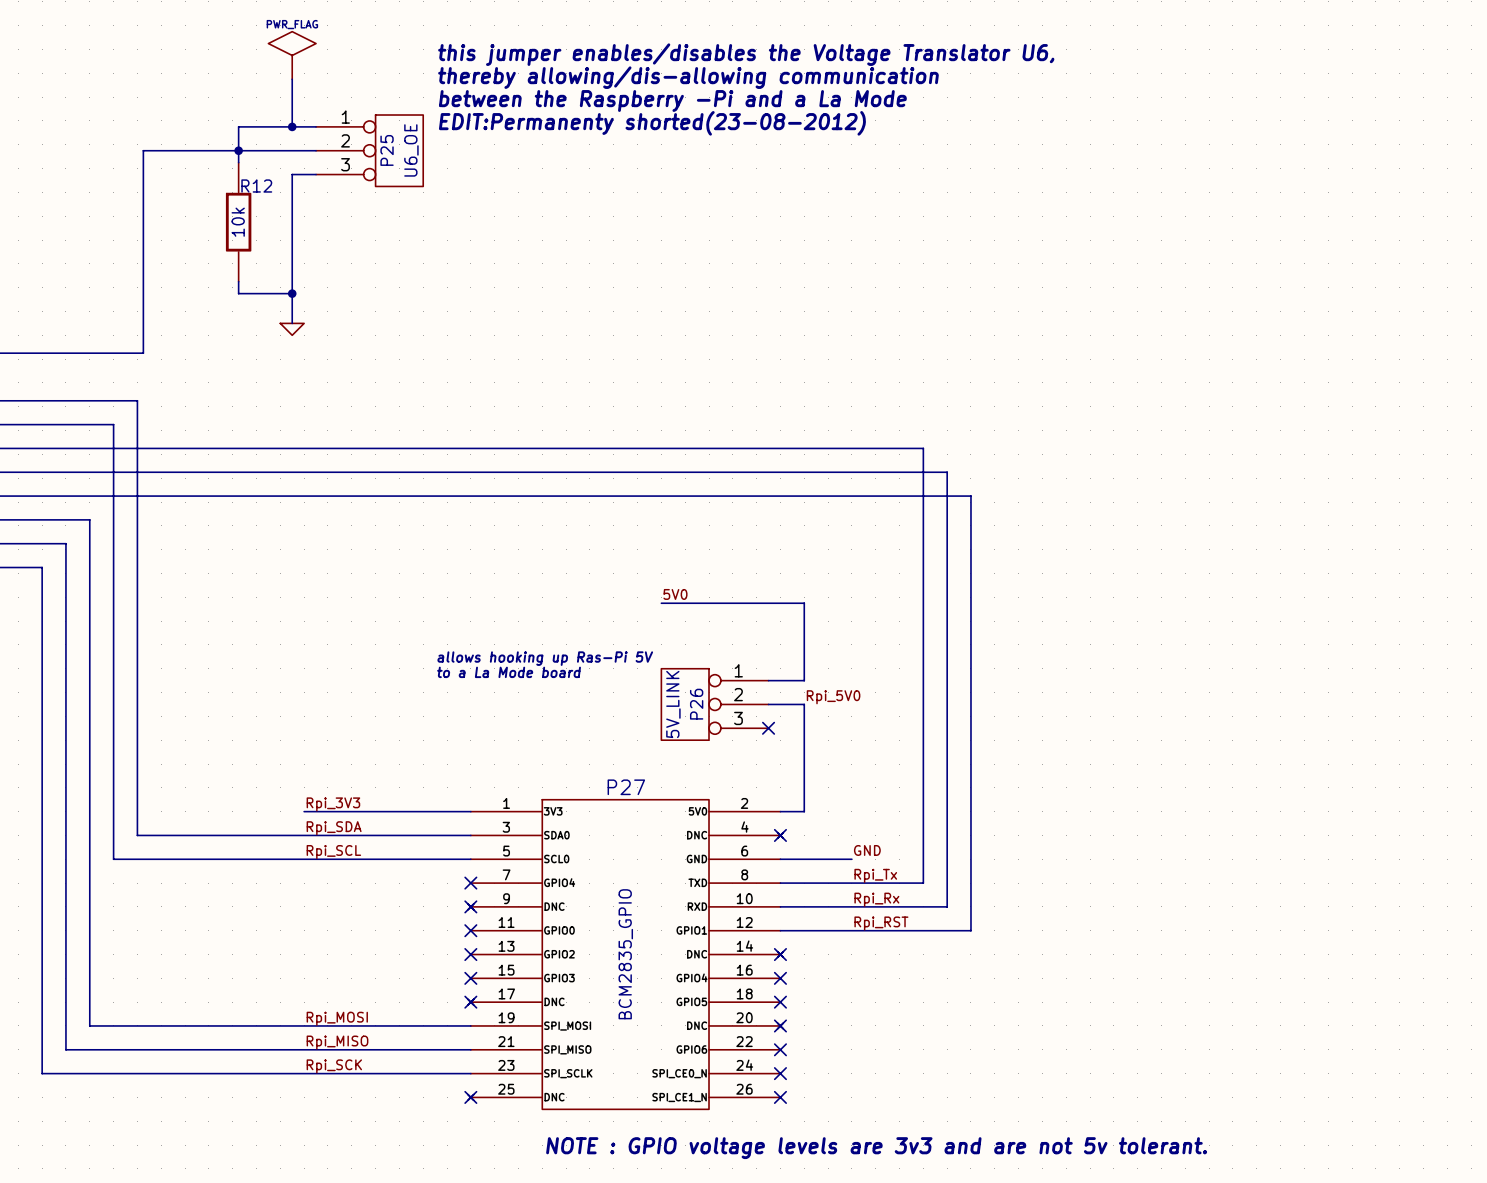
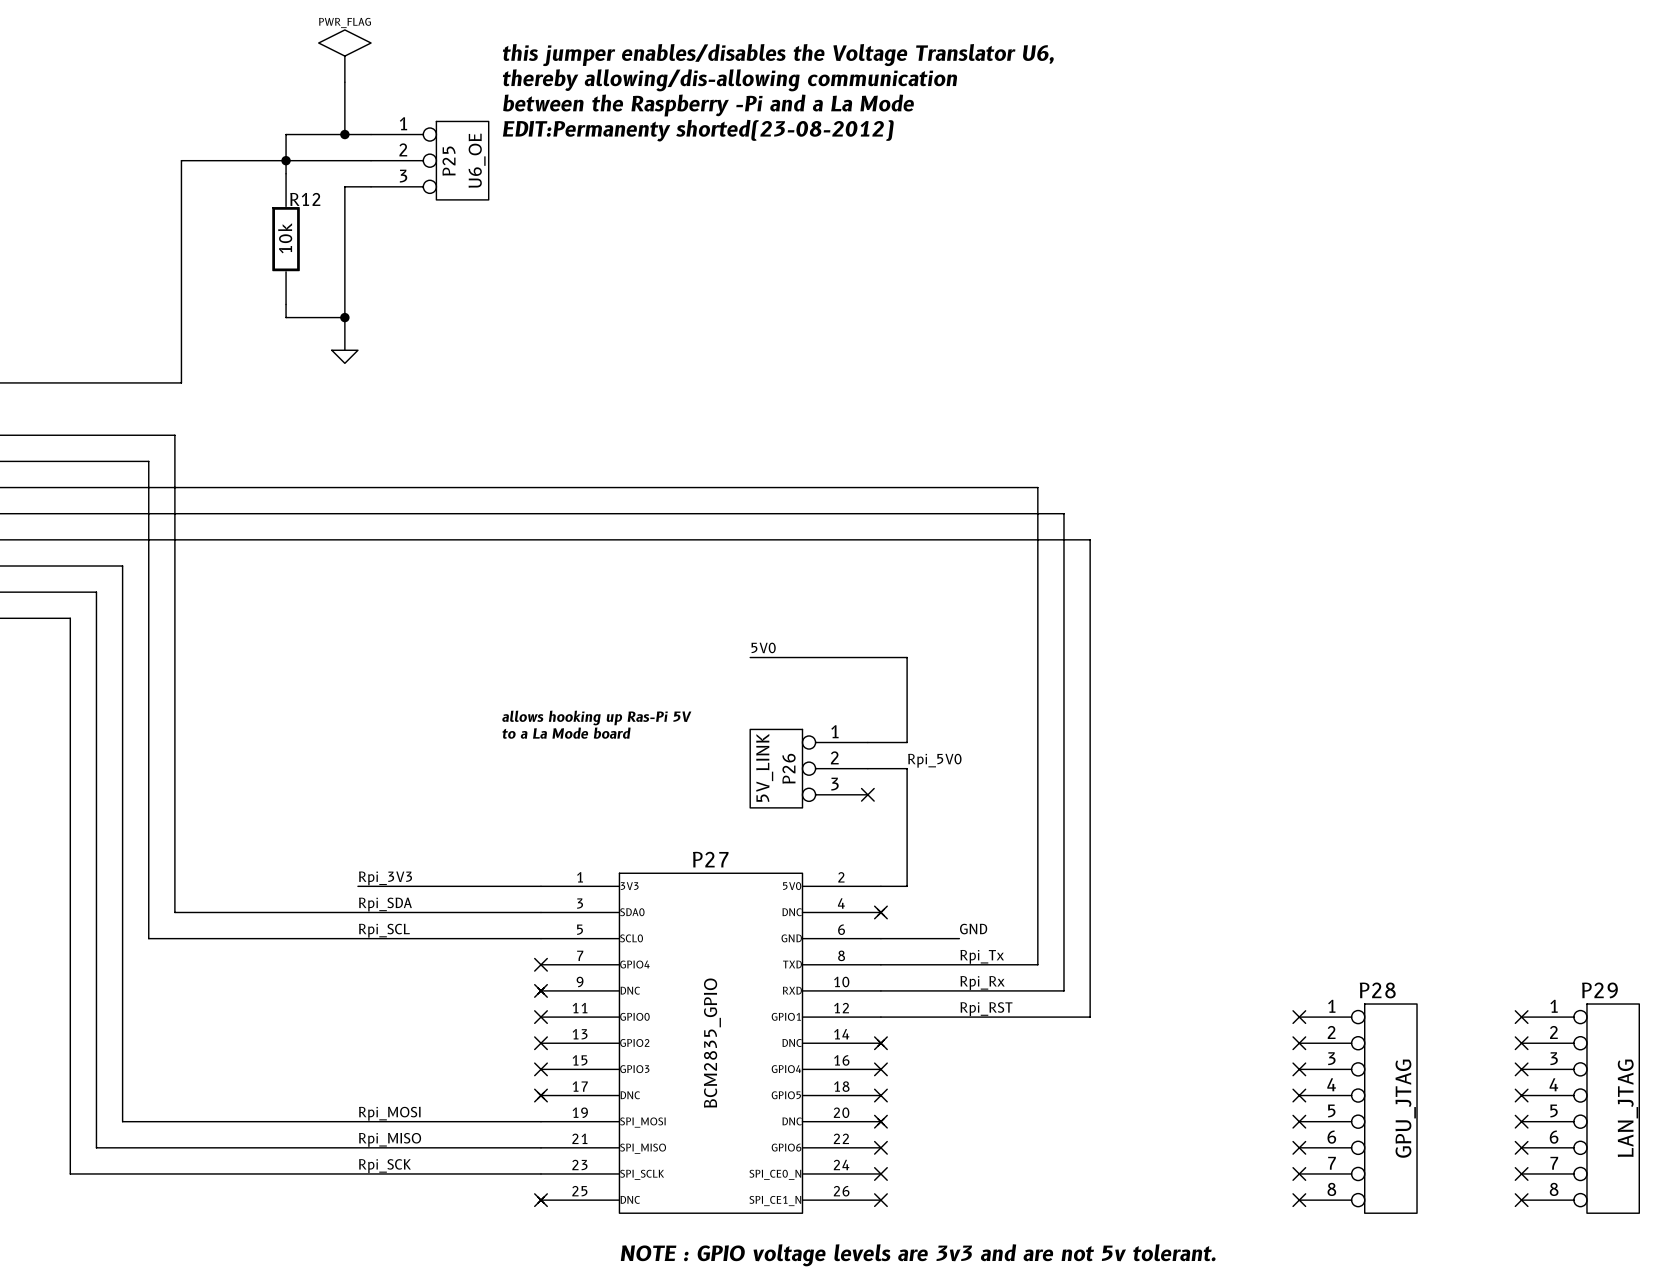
no-connect mark: none -> (1299, 1017)
no-connect mark: none -> (1521, 1017)
no-connect mark: none -> (1299, 1043)
no-connect mark: none -> (1521, 1043)
no-connect mark: none -> (1299, 1069)
no-connect mark: none -> (1521, 1069)
no-connect mark: none -> (1299, 1095)
no-connect mark: none -> (1521, 1095)
P28: none -> GPU_JTAG (1358, 1108)
P29: none -> LAN_JTAG (1580, 1108)
no-connect mark: none -> (1299, 1121)
no-connect mark: none -> (1521, 1121)
no-connect mark: none -> (1299, 1147)
no-connect mark: none -> (1521, 1147)
no-connect mark: none -> (1299, 1173)
no-connect mark: none -> (1521, 1173)
no-connect mark: none -> (1299, 1200)
no-connect mark: none -> (1521, 1200)

